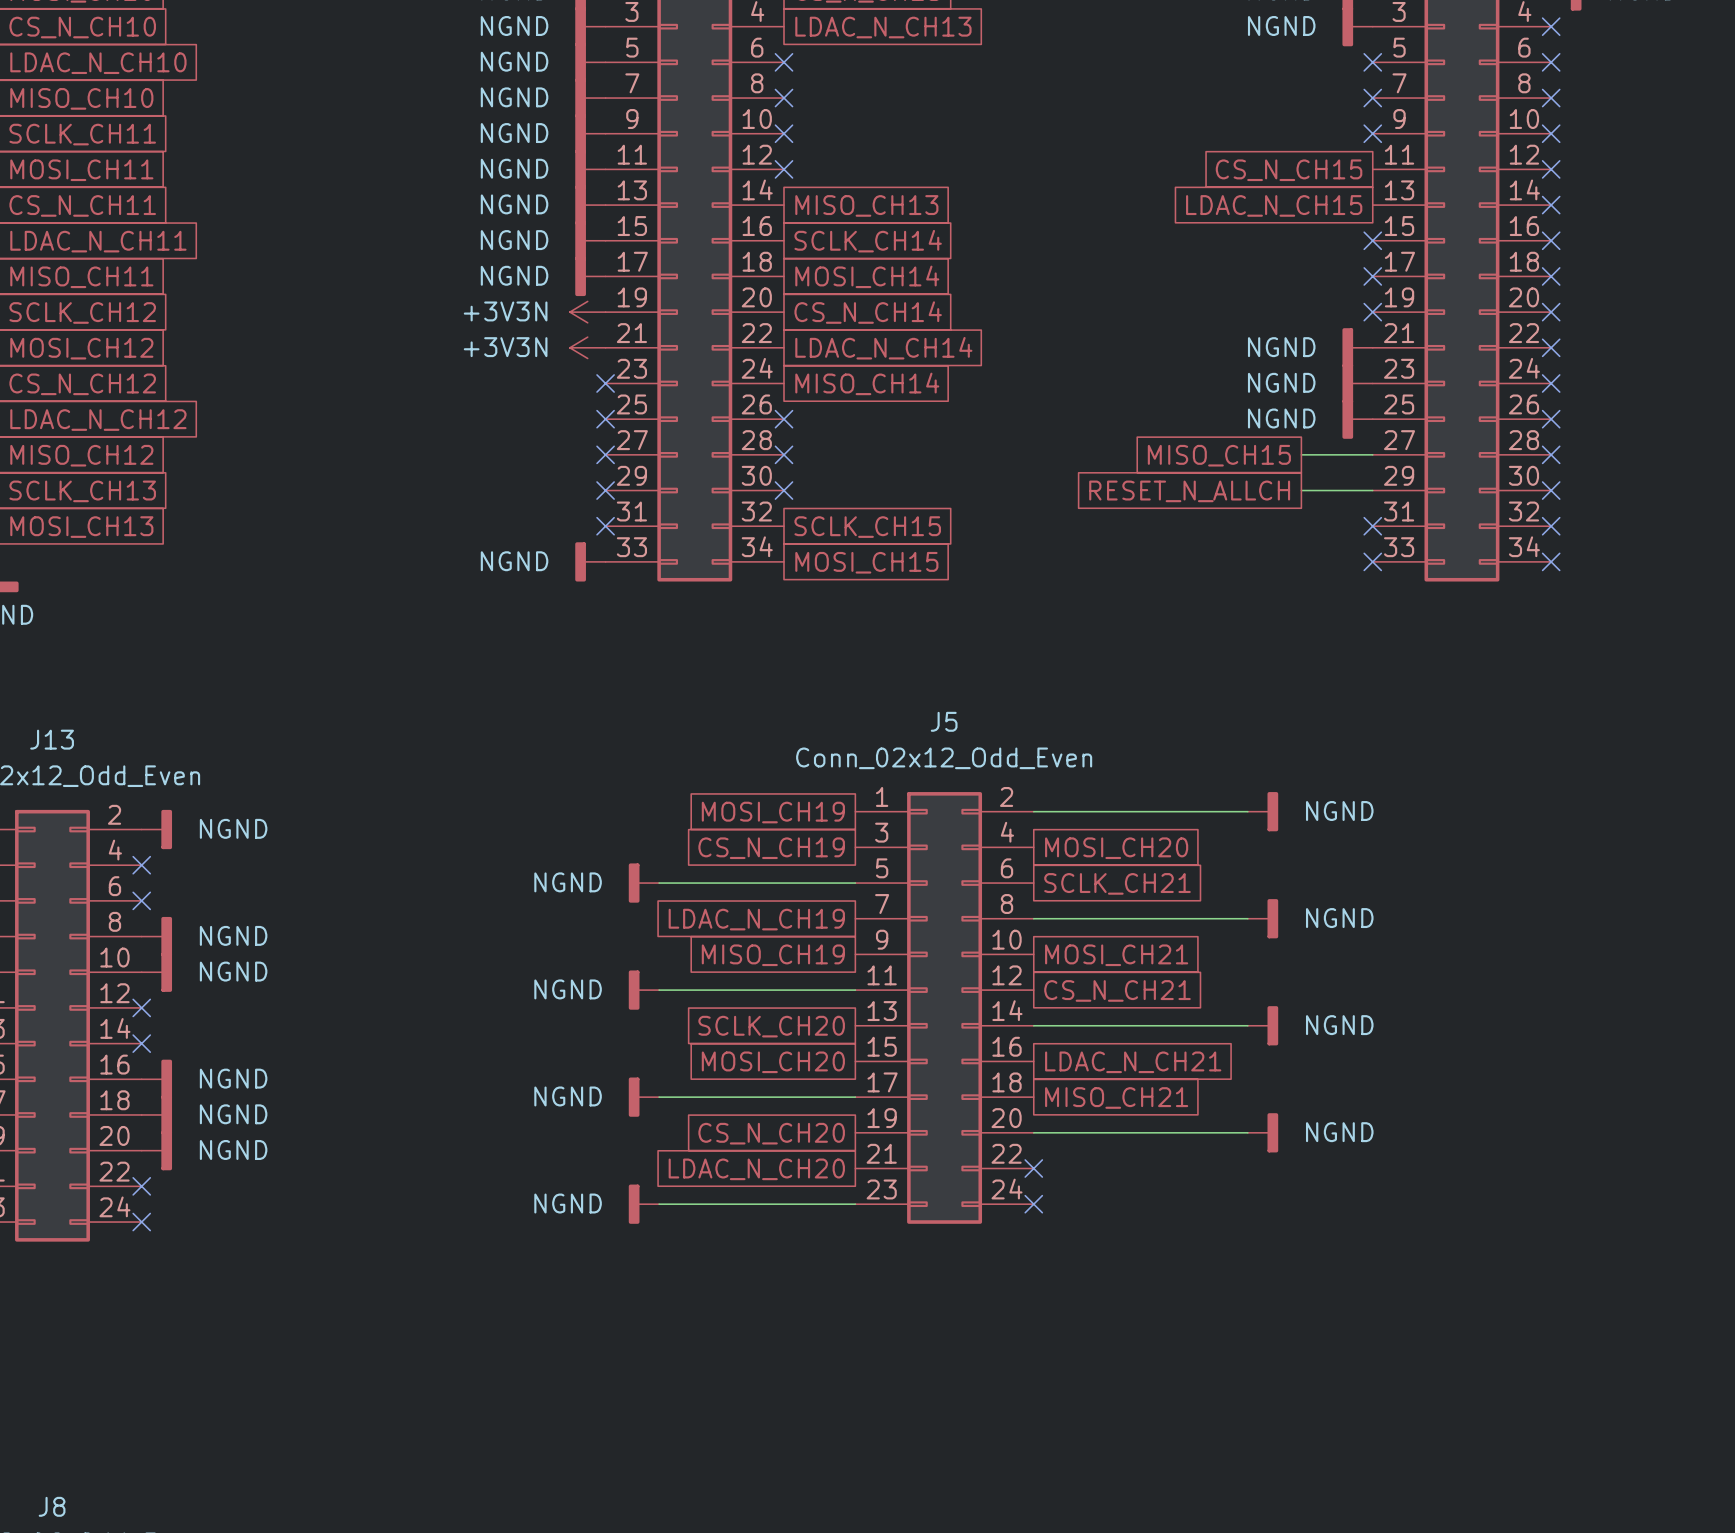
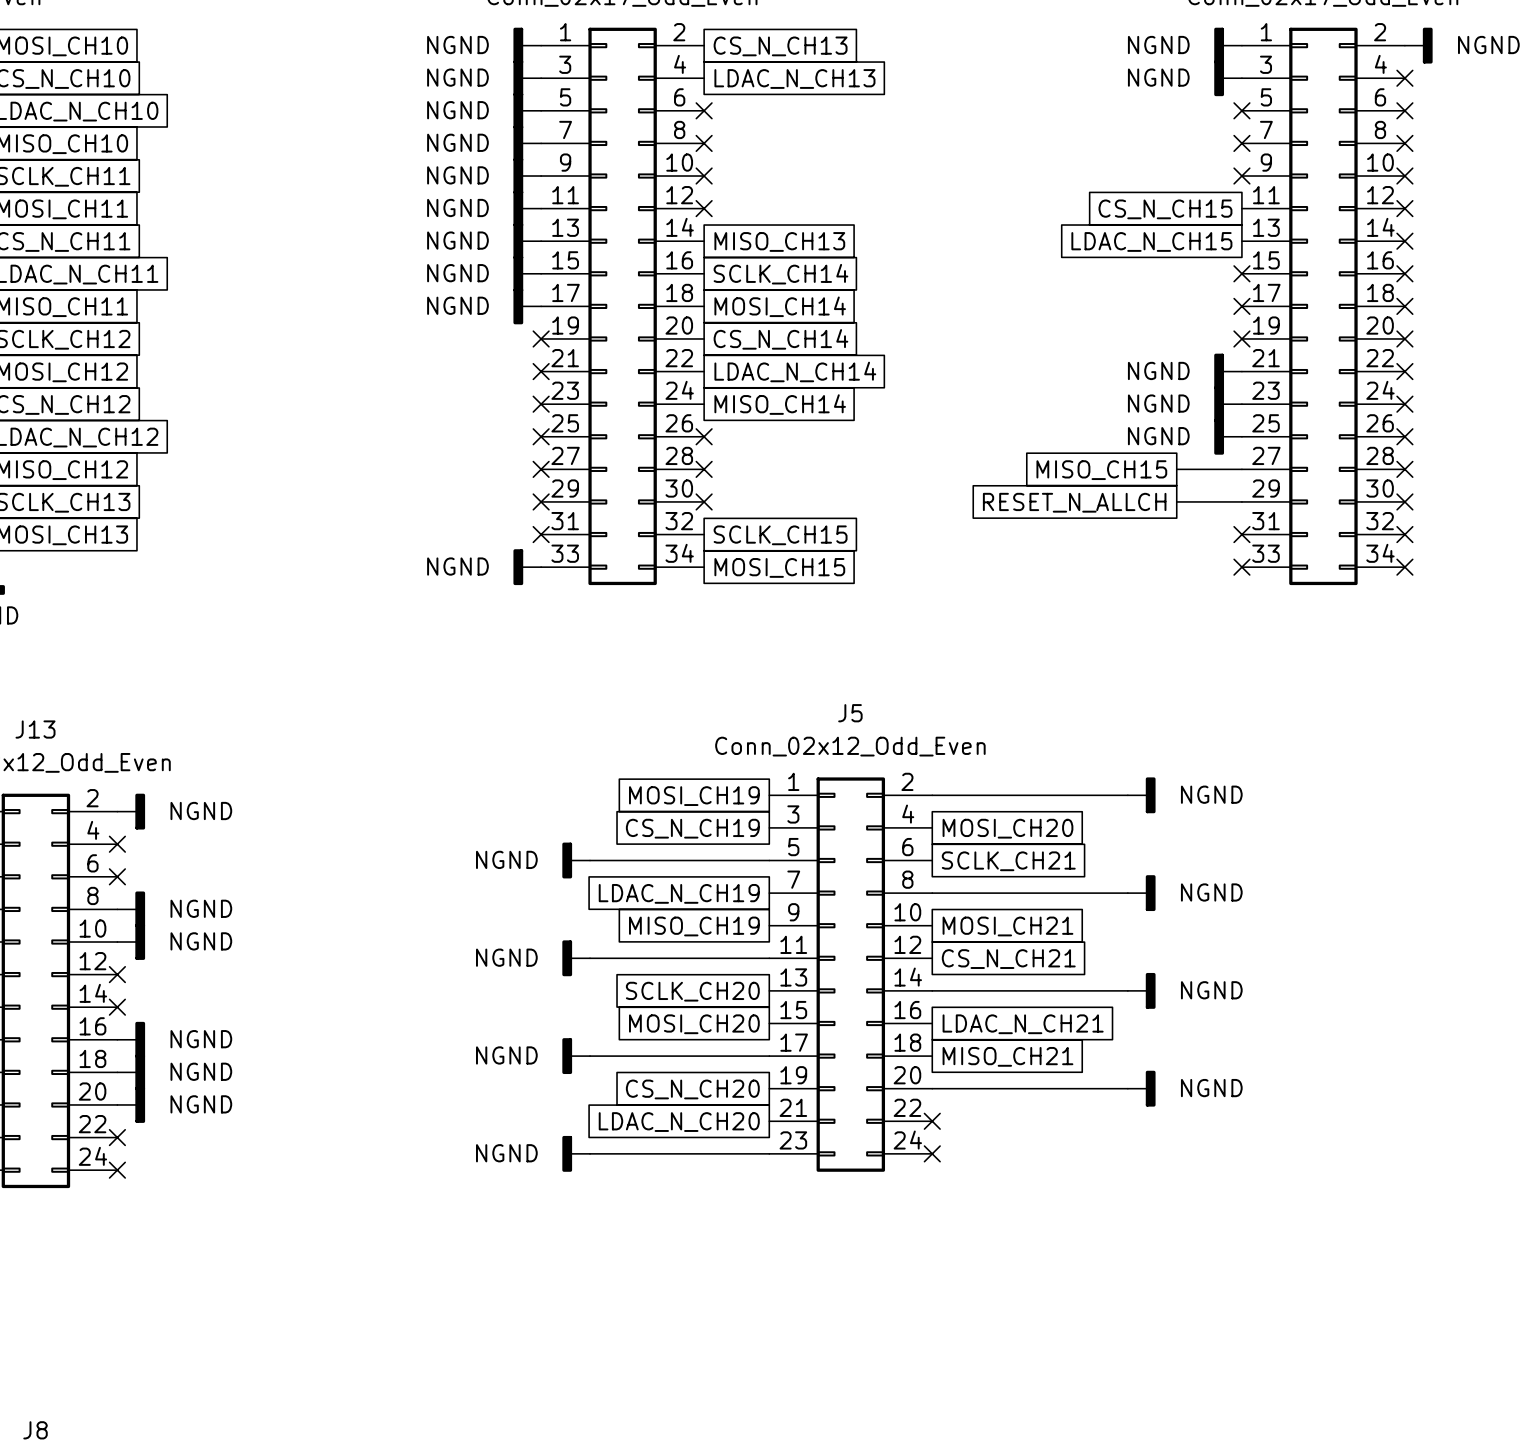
power symbol: +3V3N (587, 312) -> none
no-connect mark: none -> (541, 338)
power symbol: +3V3N (587, 347) -> none
no-connect mark: none -> (541, 371)

